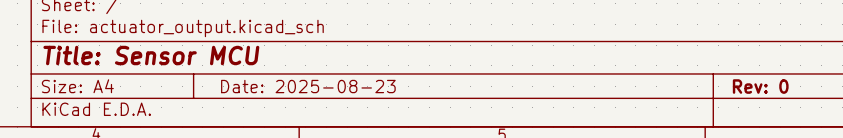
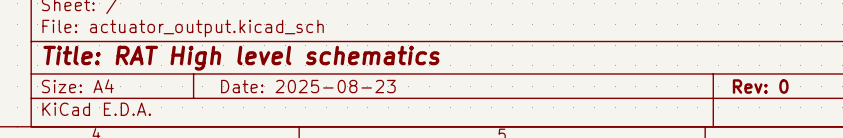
title block: Title: Sensor MCU (151, 55) -> Title: RAT High level schematics (241, 58)

